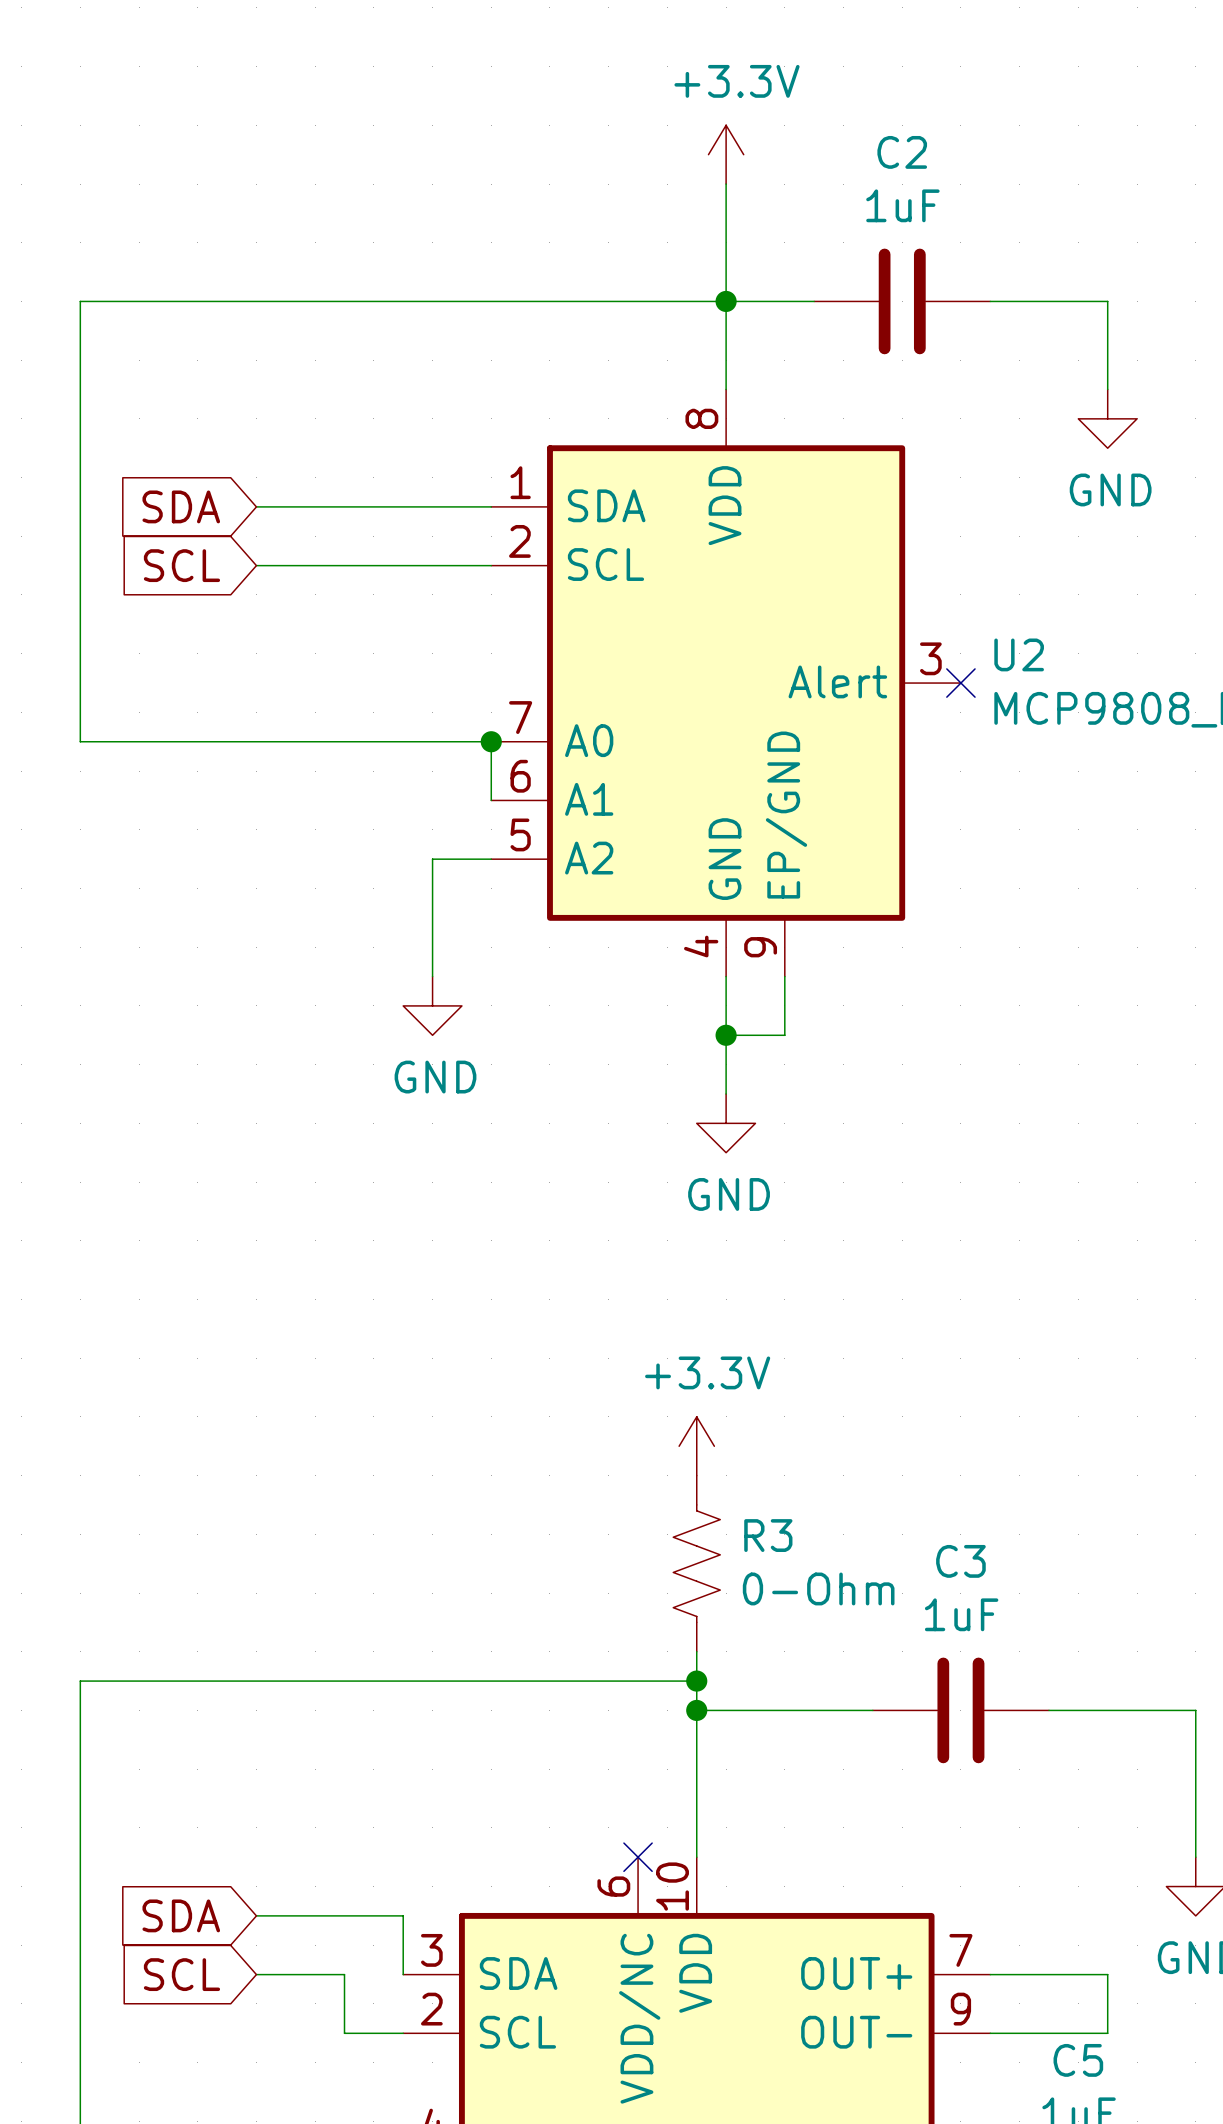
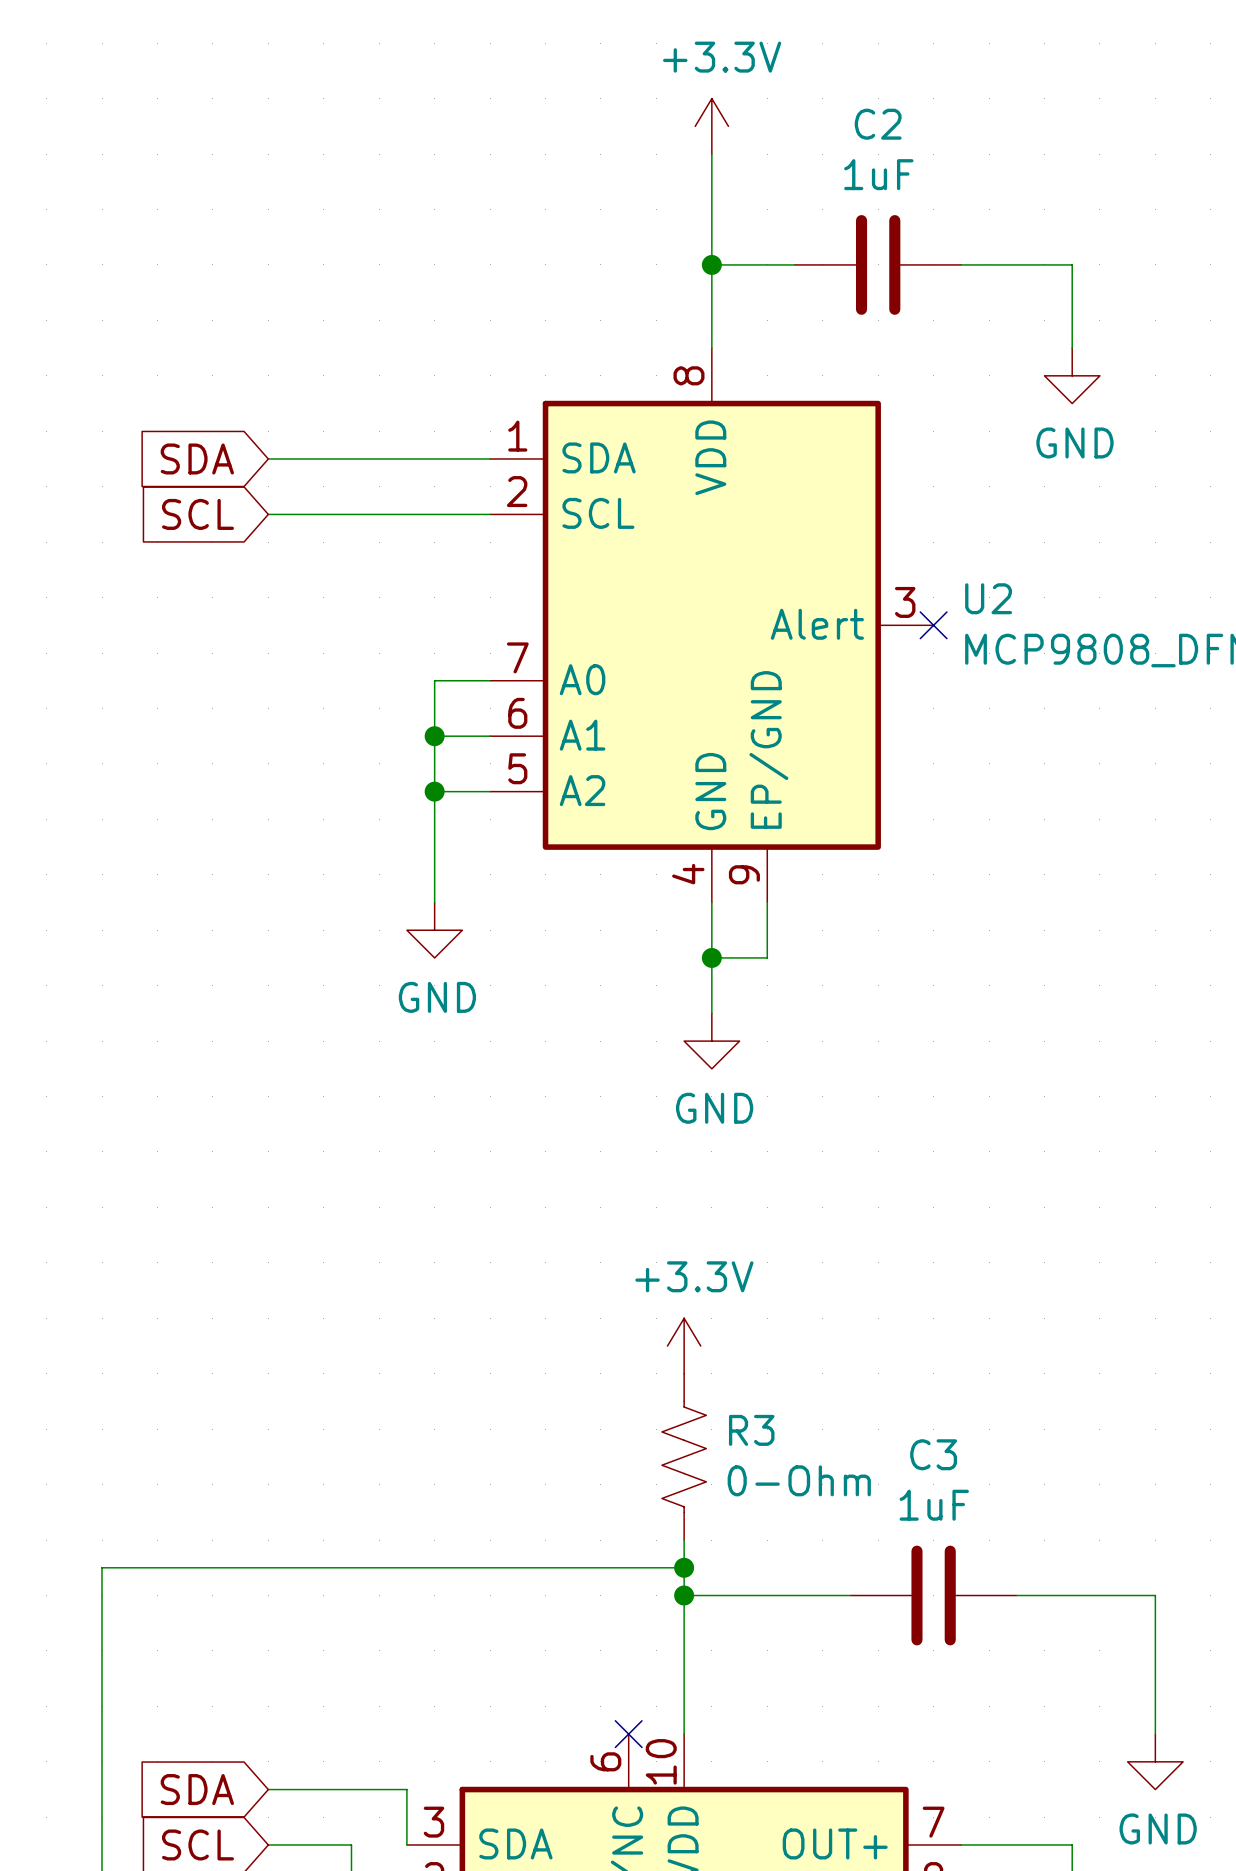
wire: (726, 301) (80, 301) (80, 741) (432, 741) -> (434, 791) (434, 680)
wire: (491, 741) (491, 800) -> (434, 736) (490, 736)
junction: (491, 741) -> none
junction: none -> (434, 736)
junction: none -> (434, 791)

